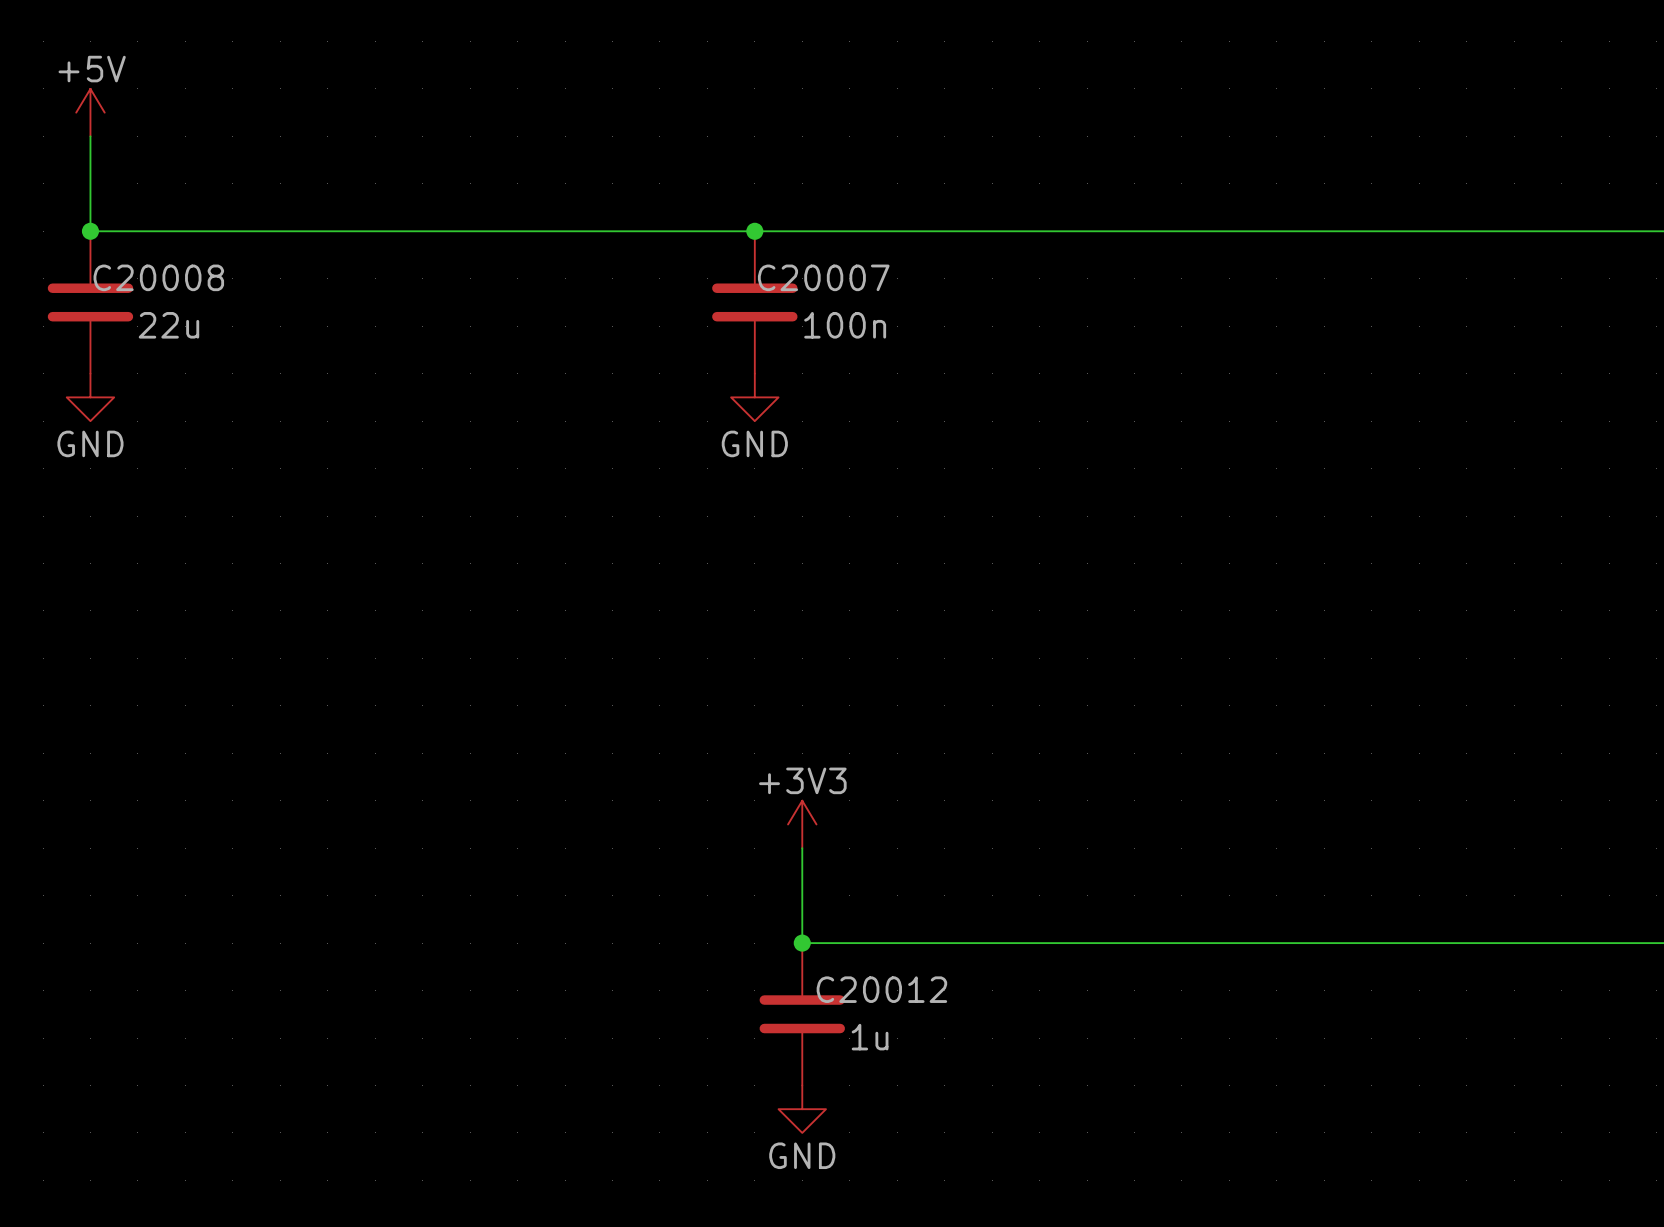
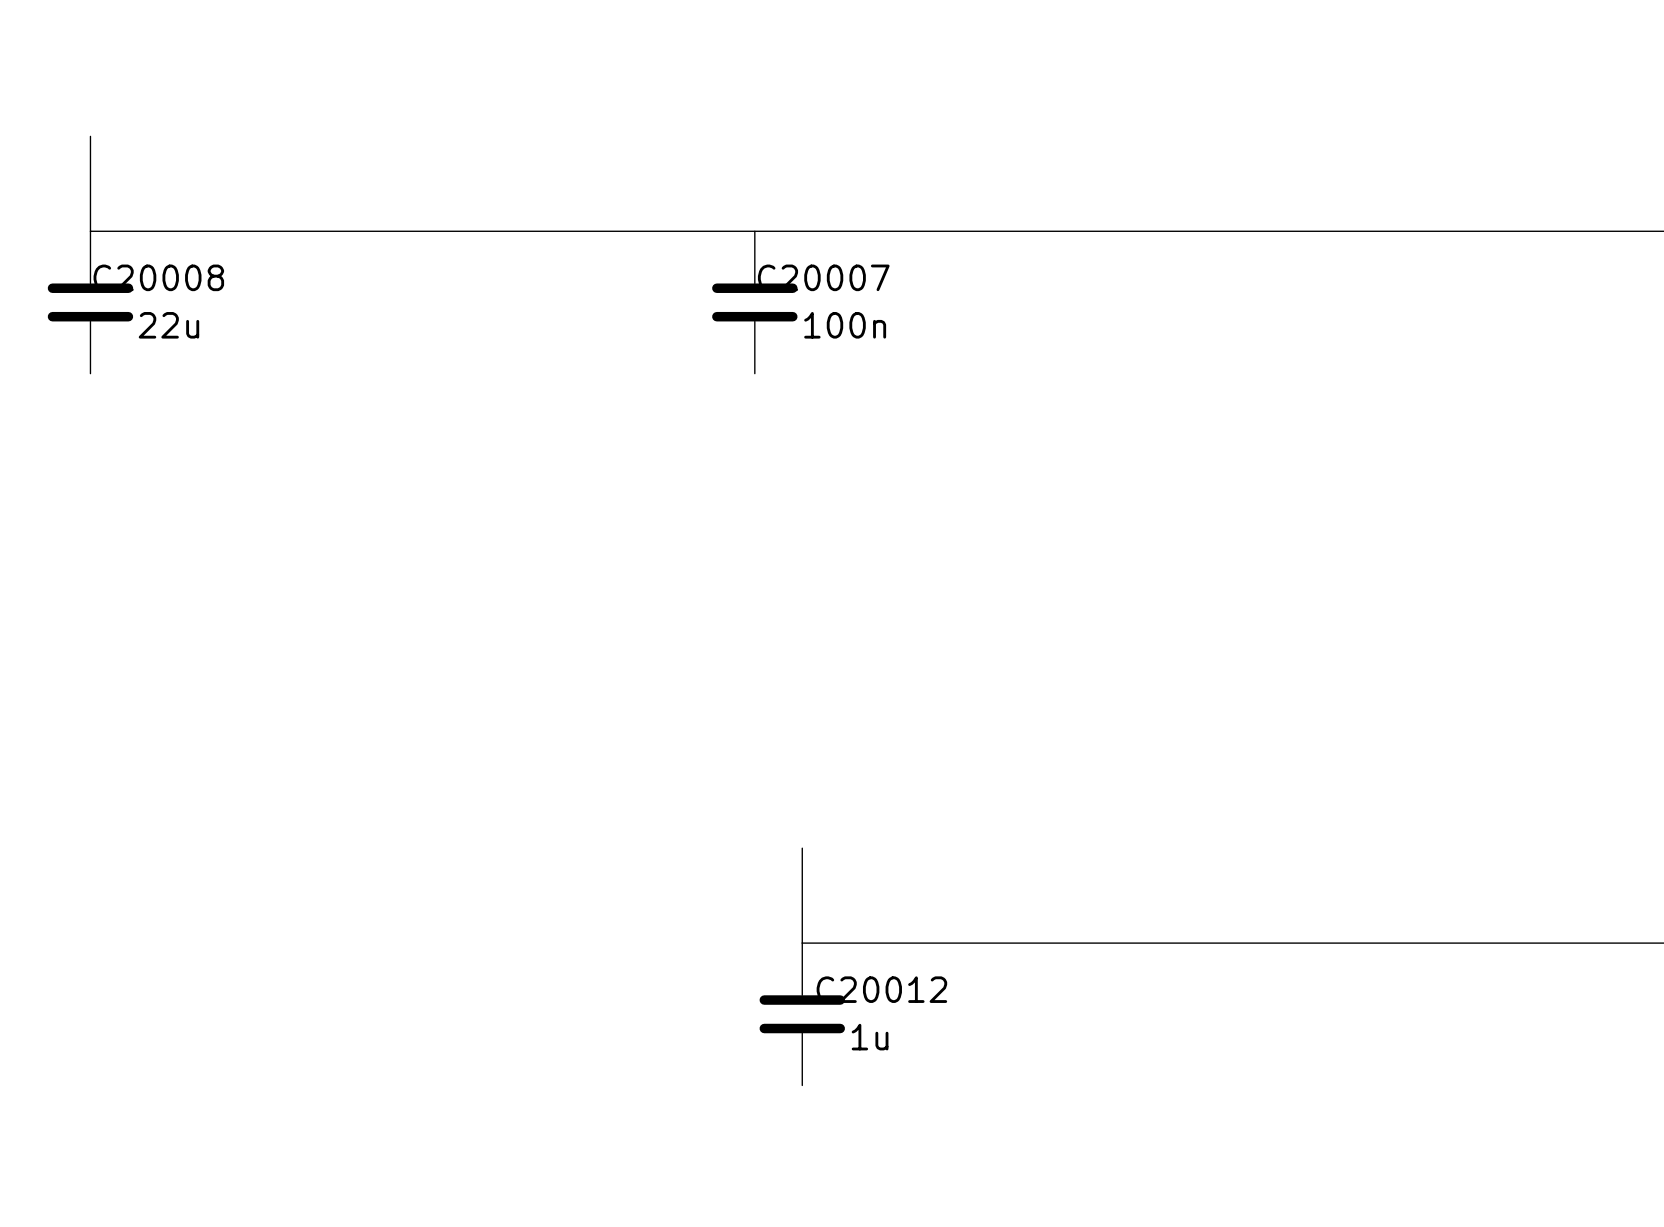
power symbol: +5V (90, 112) -> none
junction: (90, 231) -> none
junction: (754, 231) -> none
power symbol: GND (90, 397) -> none
power symbol: GND (754, 397) -> none
power symbol: +3V3 (802, 824) -> none
junction: (802, 943) -> none
power symbol: GND (802, 1109) -> none

